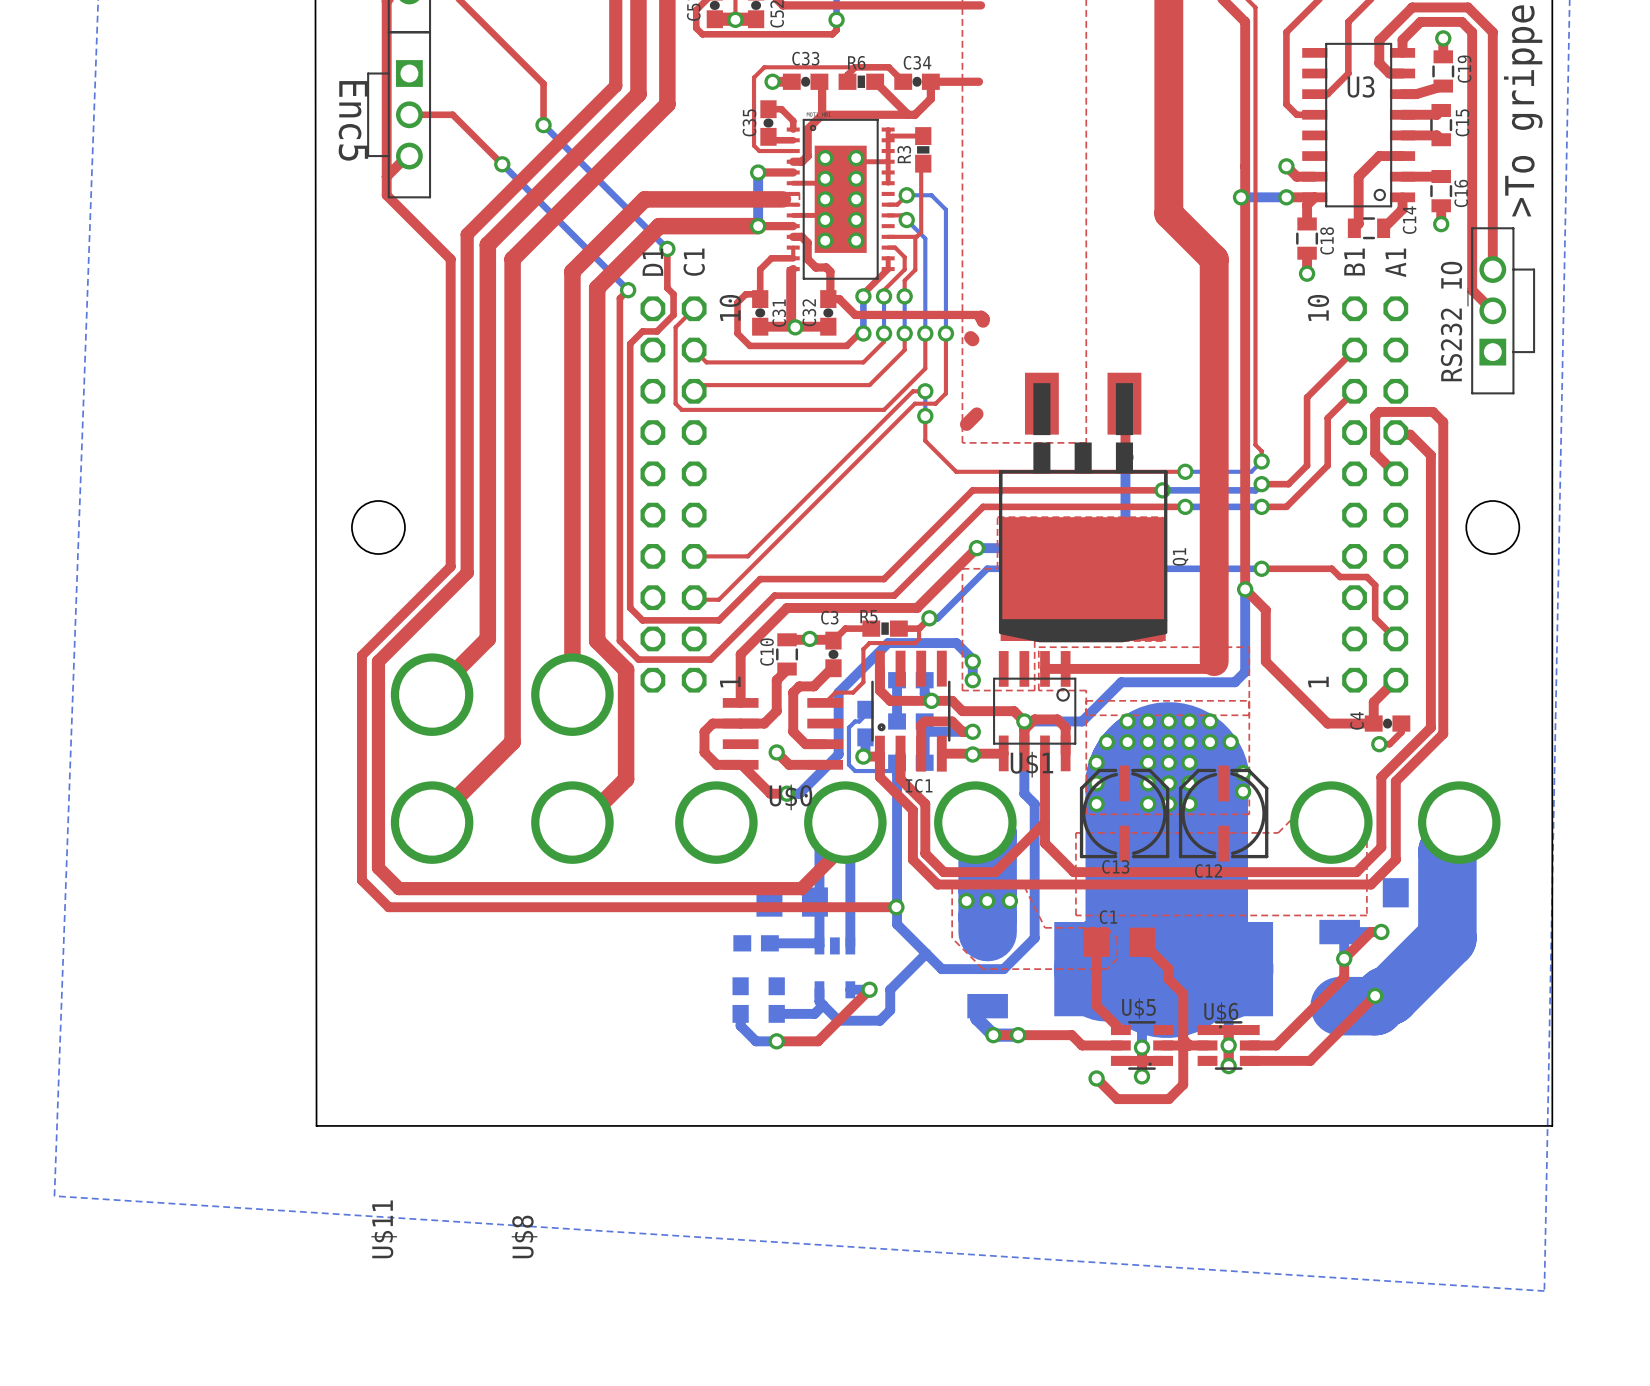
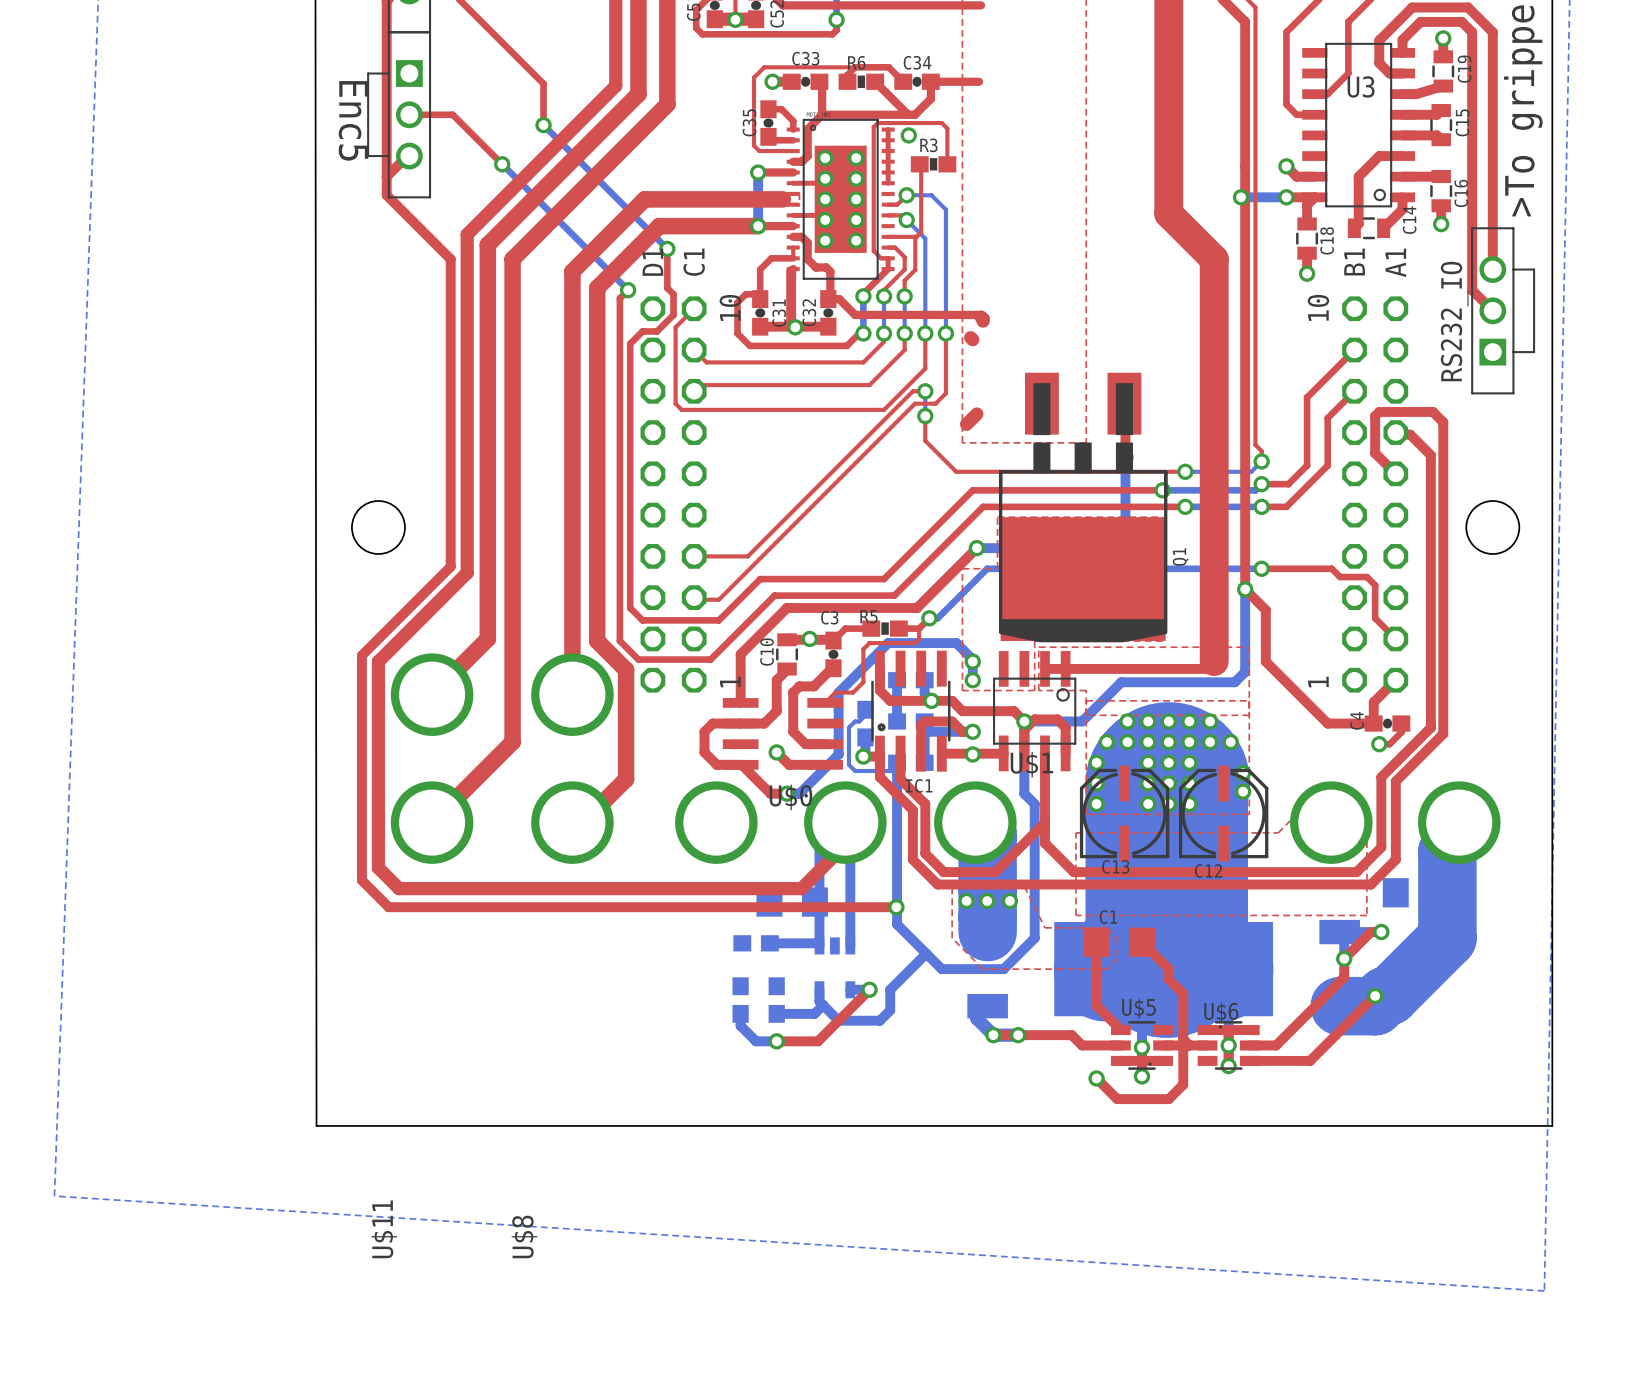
via: none -> (908, 135)
top track: (923, 136) (892, 136) (888, 140) -> none
R3 rotation: 0° (923, 149) -> 90° clockwise (933, 164)
top track: (859, 161) (888, 161) -> none
top track: none -> (947, 164) (947, 128) (941, 123) (877, 123) (873, 127) (873, 250) (881, 258) (888, 258)

